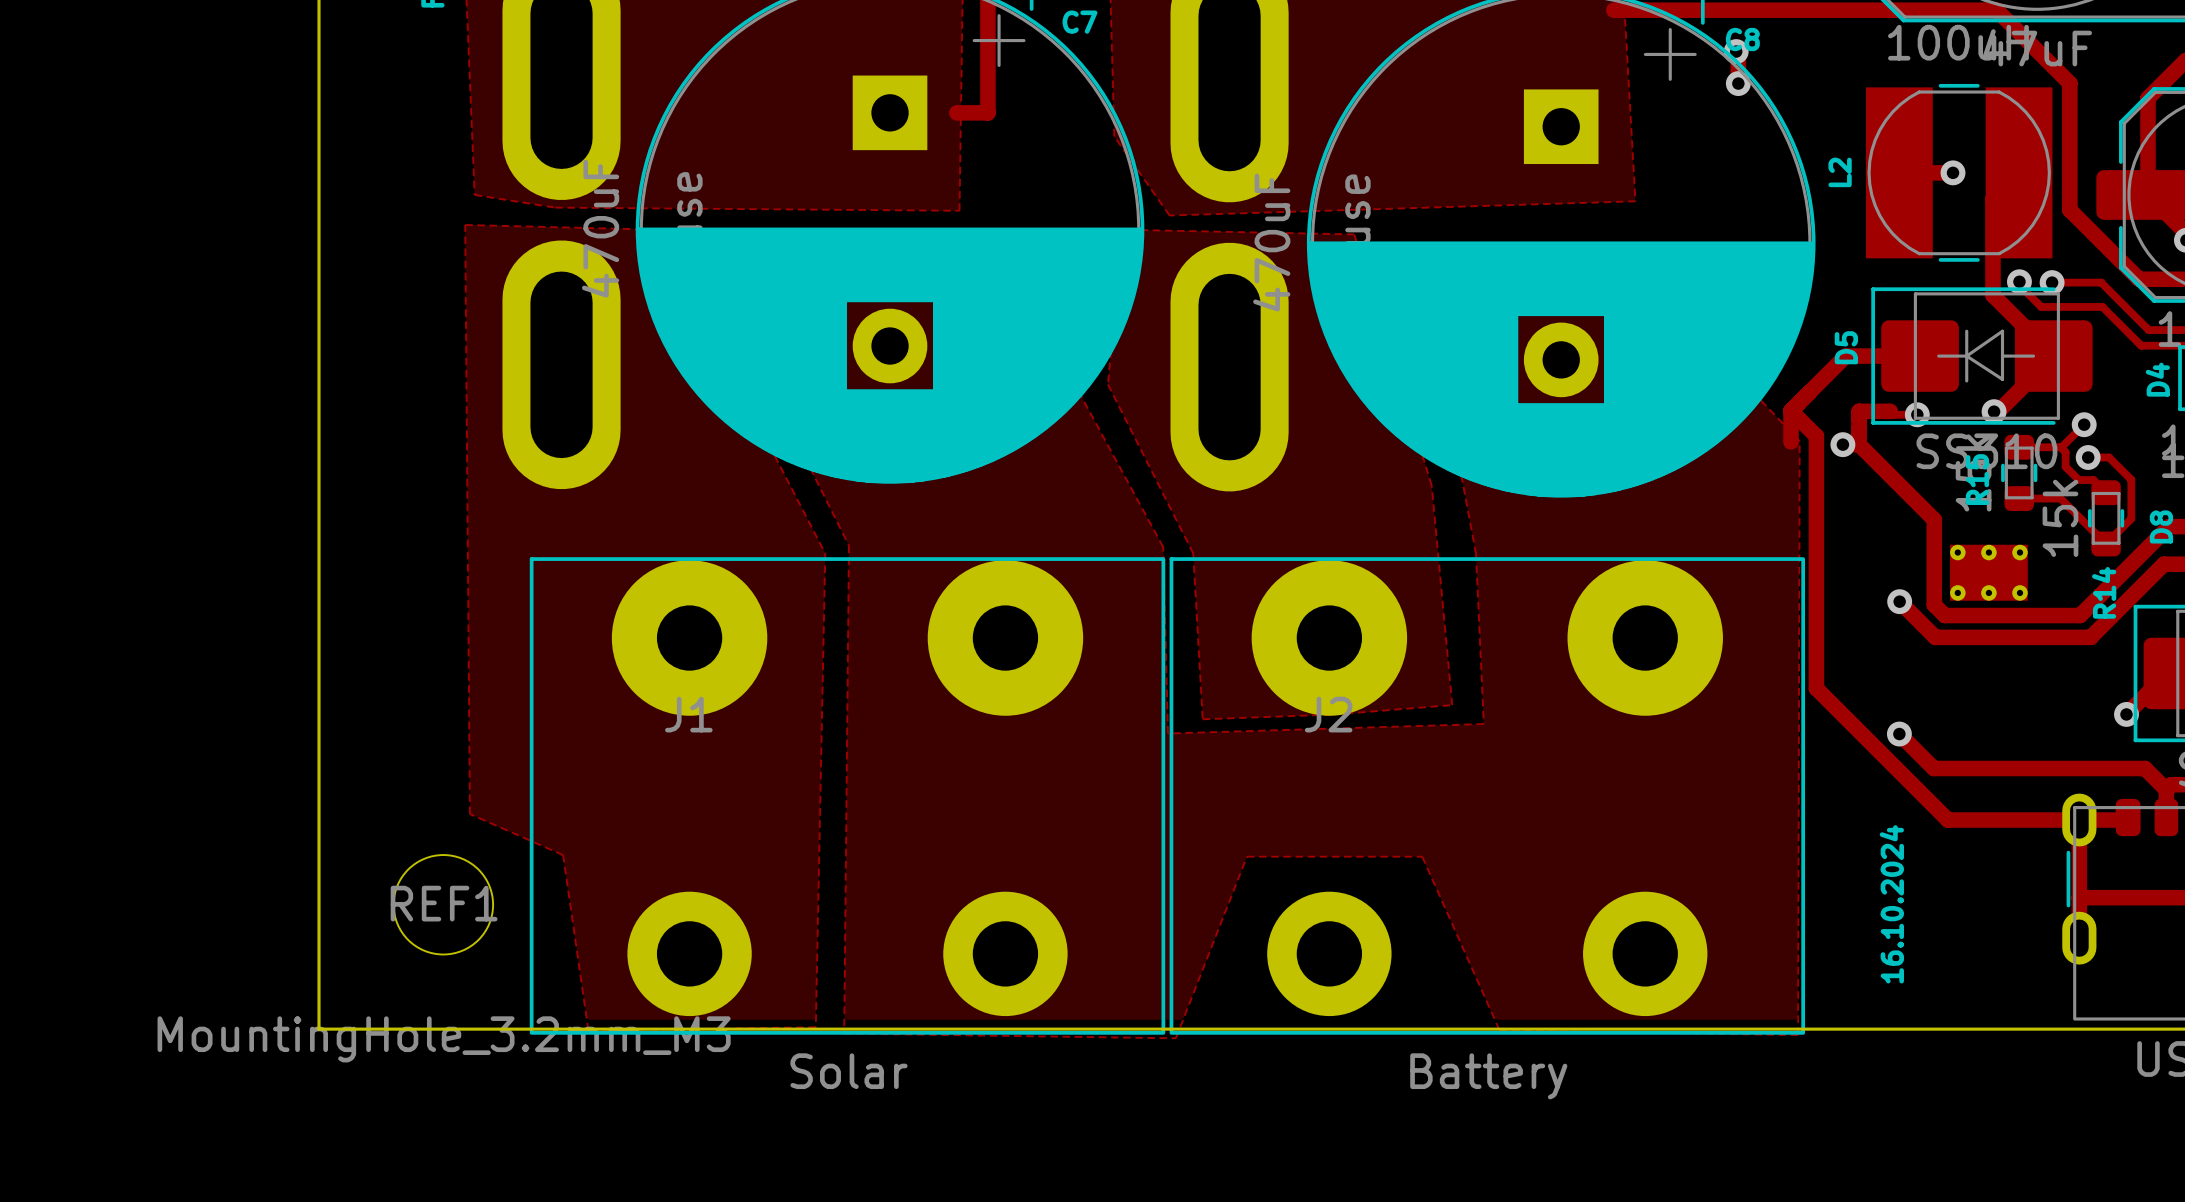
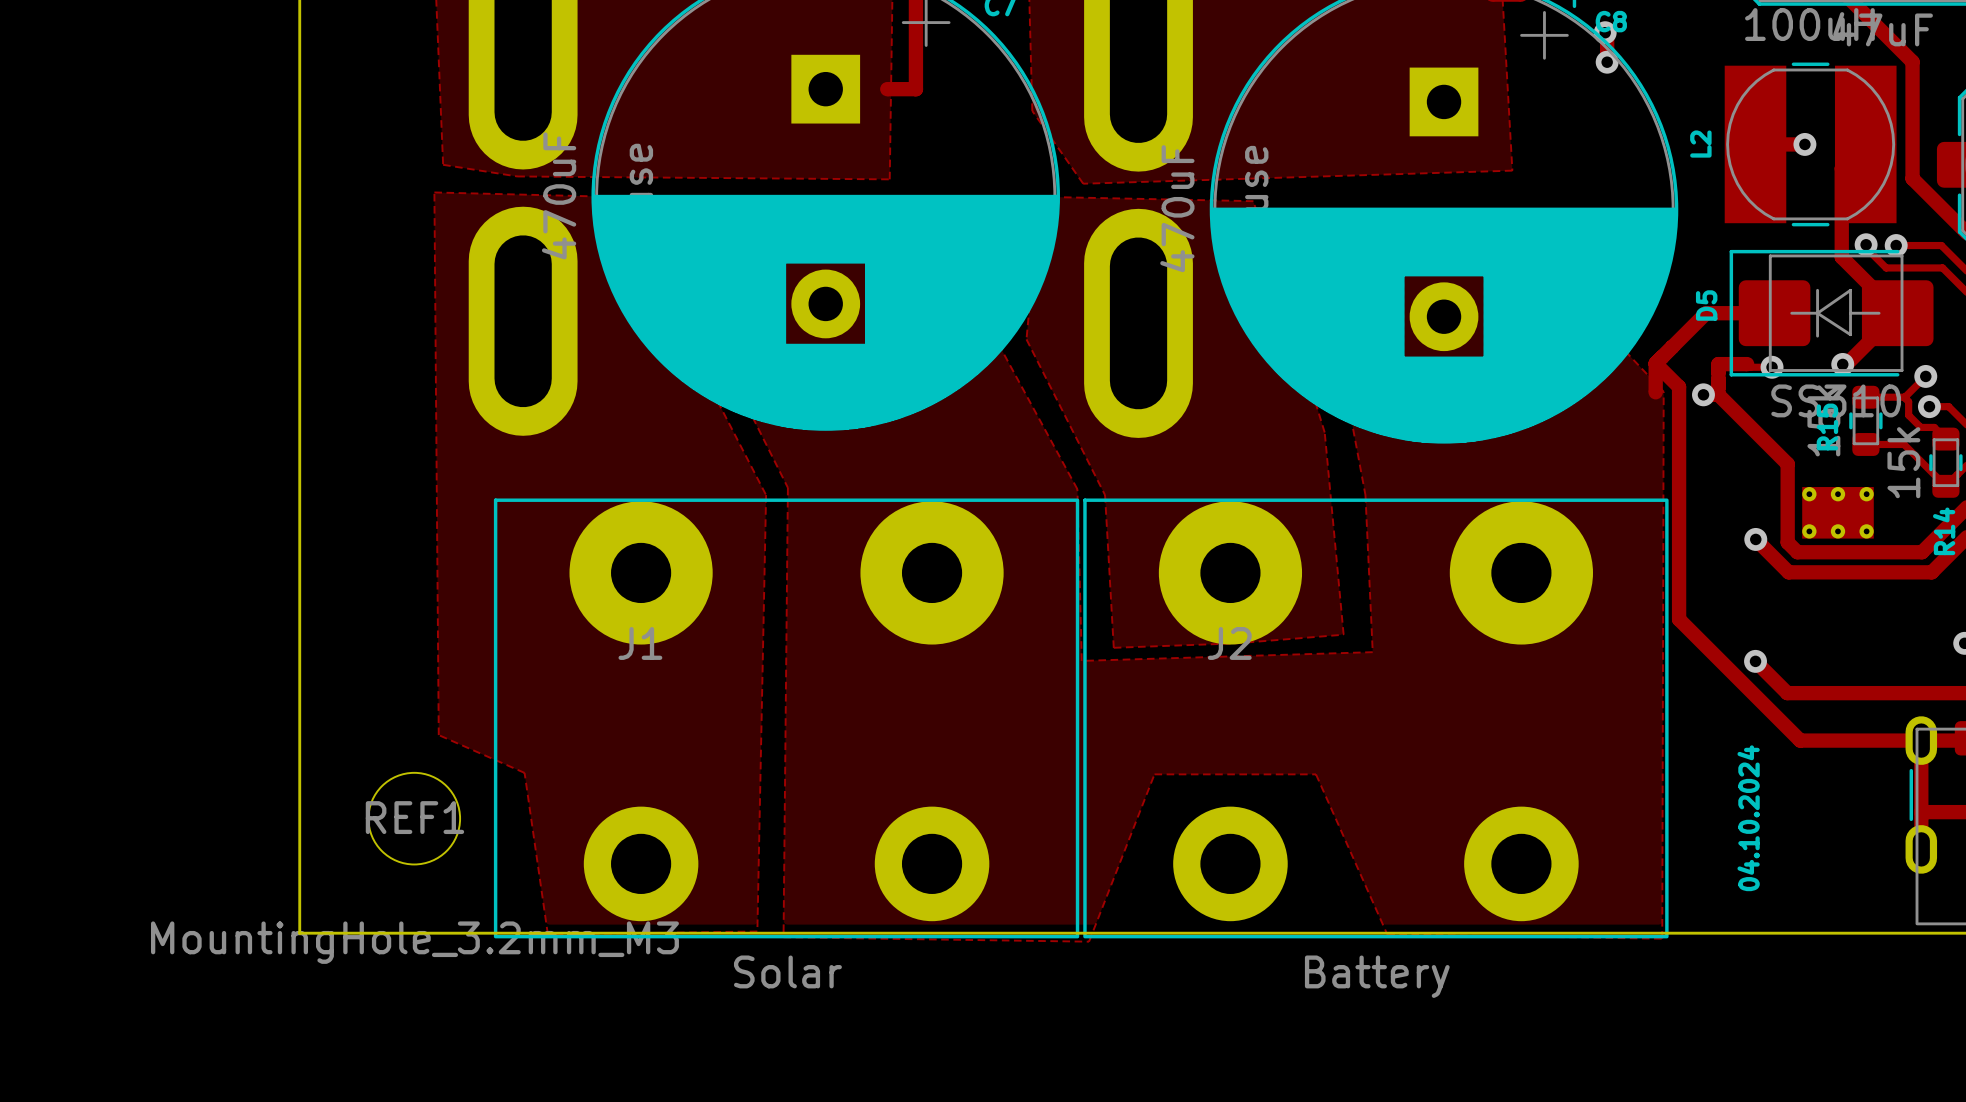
text: 16.10.2024 (1891, 904) -> 04.10.2024 (1748, 818)

